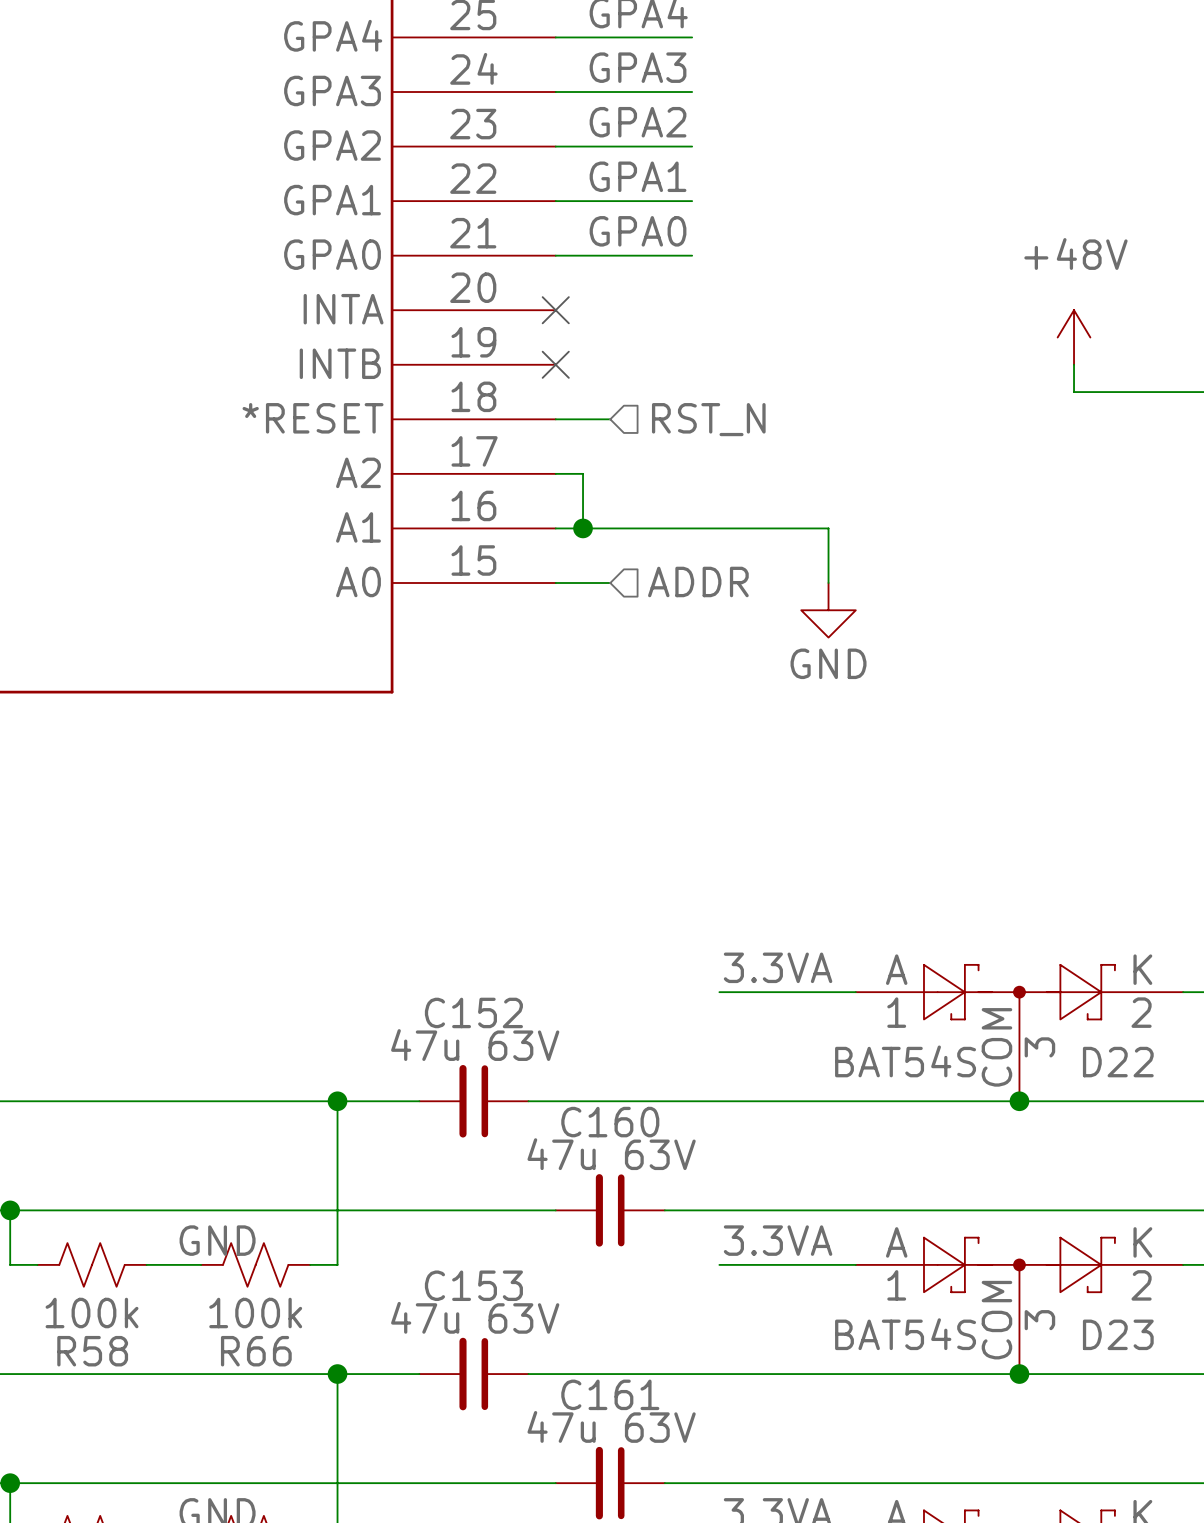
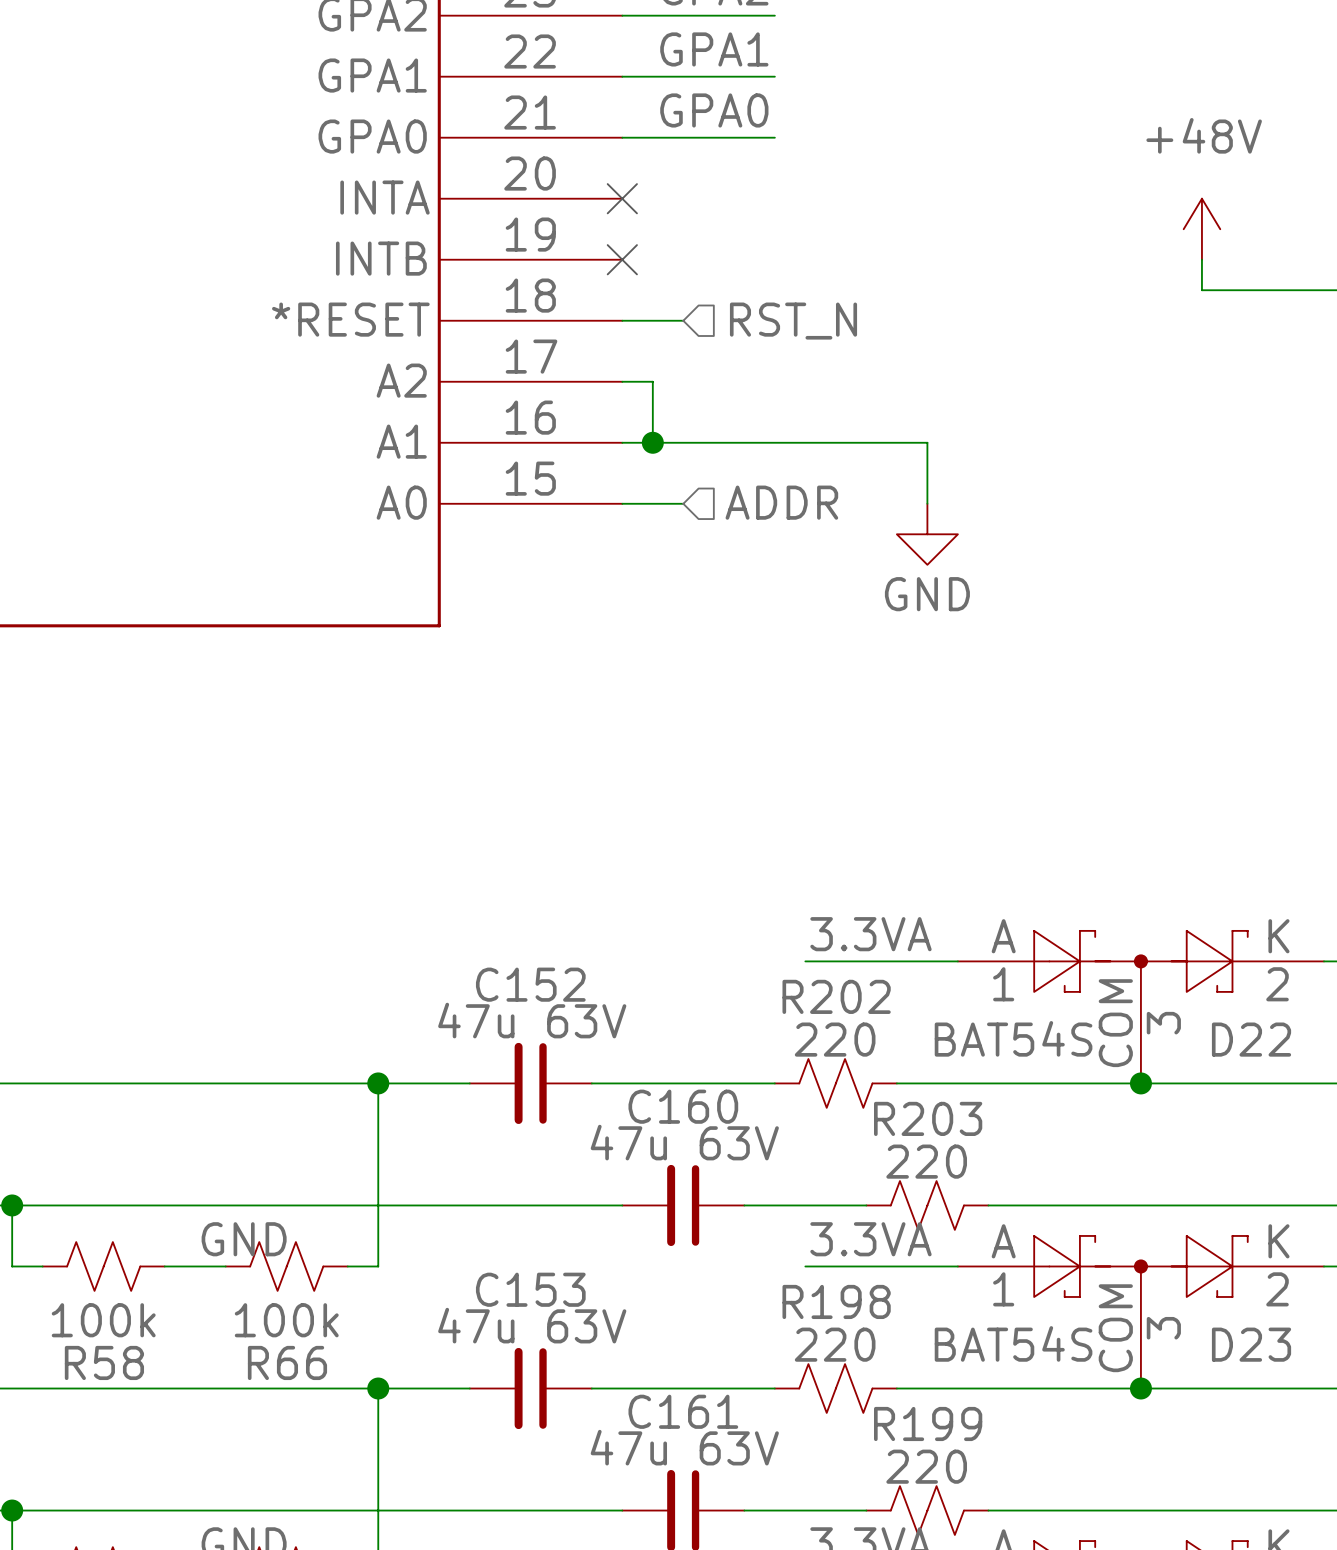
wire: (692, 1101) (801, 1101) -> none
R202: none -> 220 (835, 1083)
wire: (773, 1210) (883, 1210) -> none
R203: none -> 220 (927, 1205)
wire: (692, 1374) (801, 1374) -> none
R198: none -> 220 (835, 1388)
wire: (773, 1483) (883, 1483) -> none
R199: none -> 220 (927, 1510)

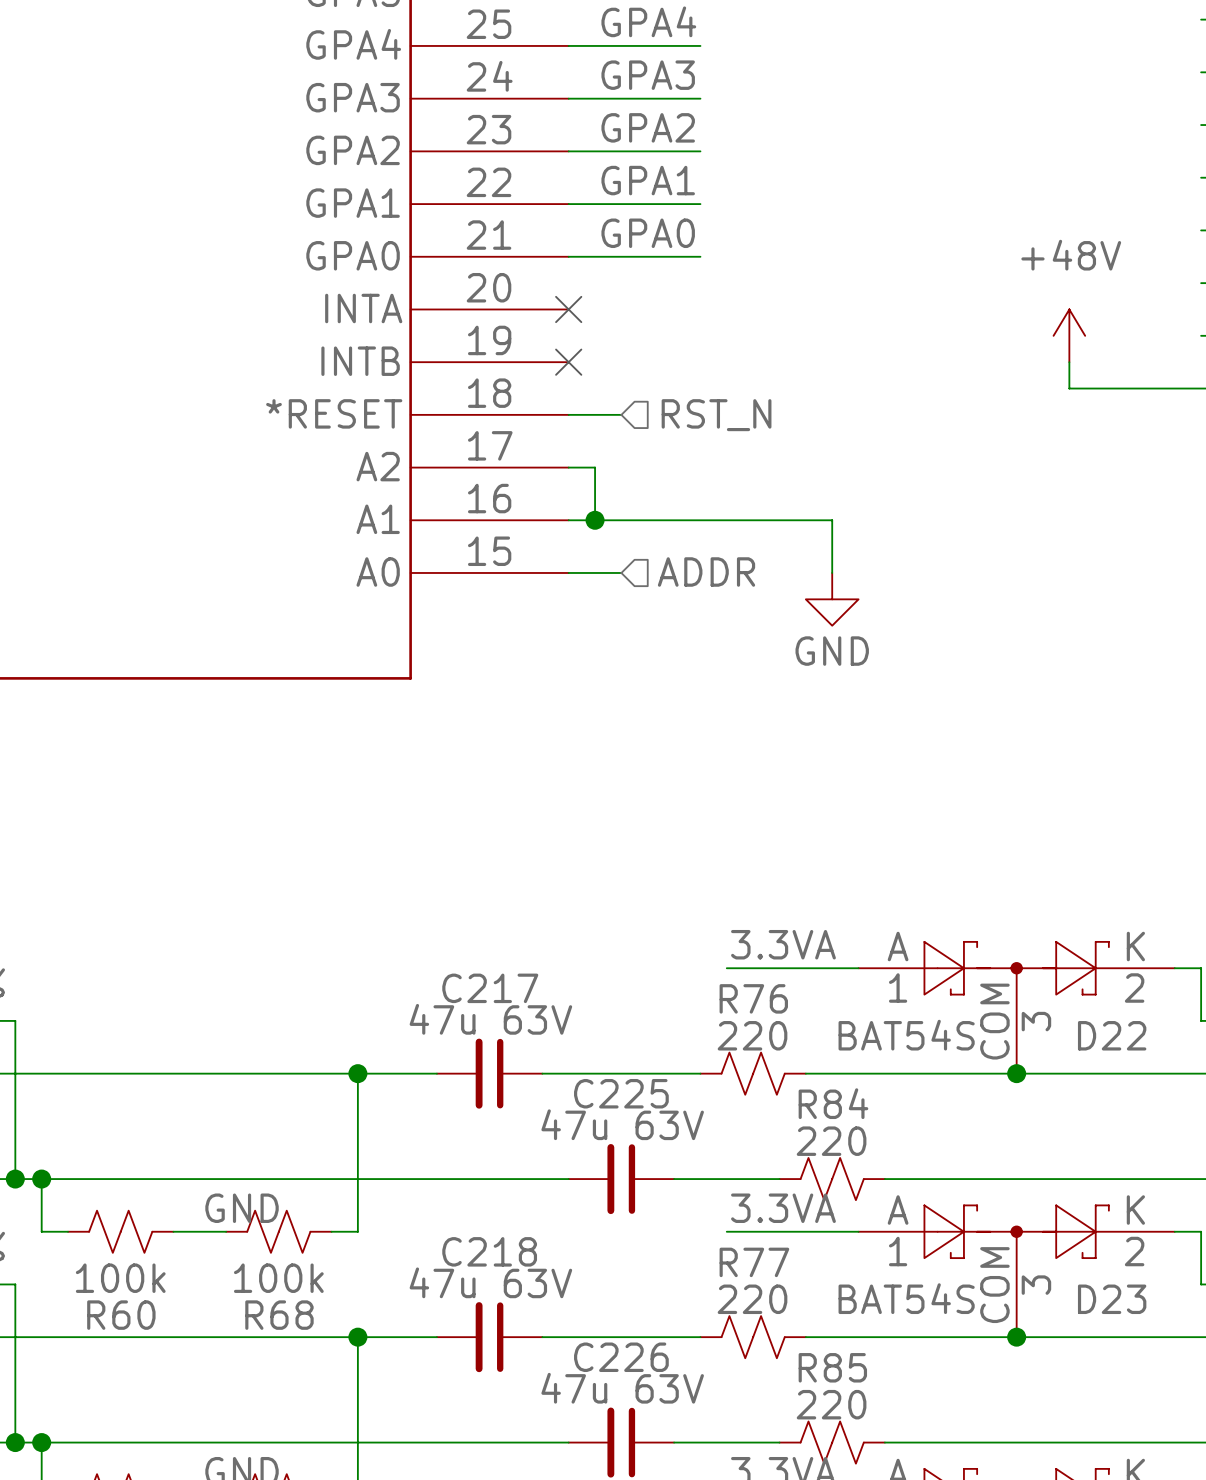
C152 name: C152 (530, 984) -> C217 (490, 988)
R202 name: R202 (836, 996) -> R76 (753, 998)
C160 name: C160 (683, 1106) -> C225 (621, 1093)
R203 name: R203 (928, 1118) -> R84 (833, 1103)
C153 name: C153 (530, 1289) -> C218 (489, 1251)
R198 name: R198 (836, 1301) -> R77 (754, 1262)
R58 name: R58 (104, 1362) -> R60 (121, 1315)
R66 name: R66 (287, 1362) -> R68 (279, 1315)
C161 name: C161 (683, 1411) -> C226 (621, 1357)
R199 name: R199 (928, 1423) -> R85 (832, 1367)

